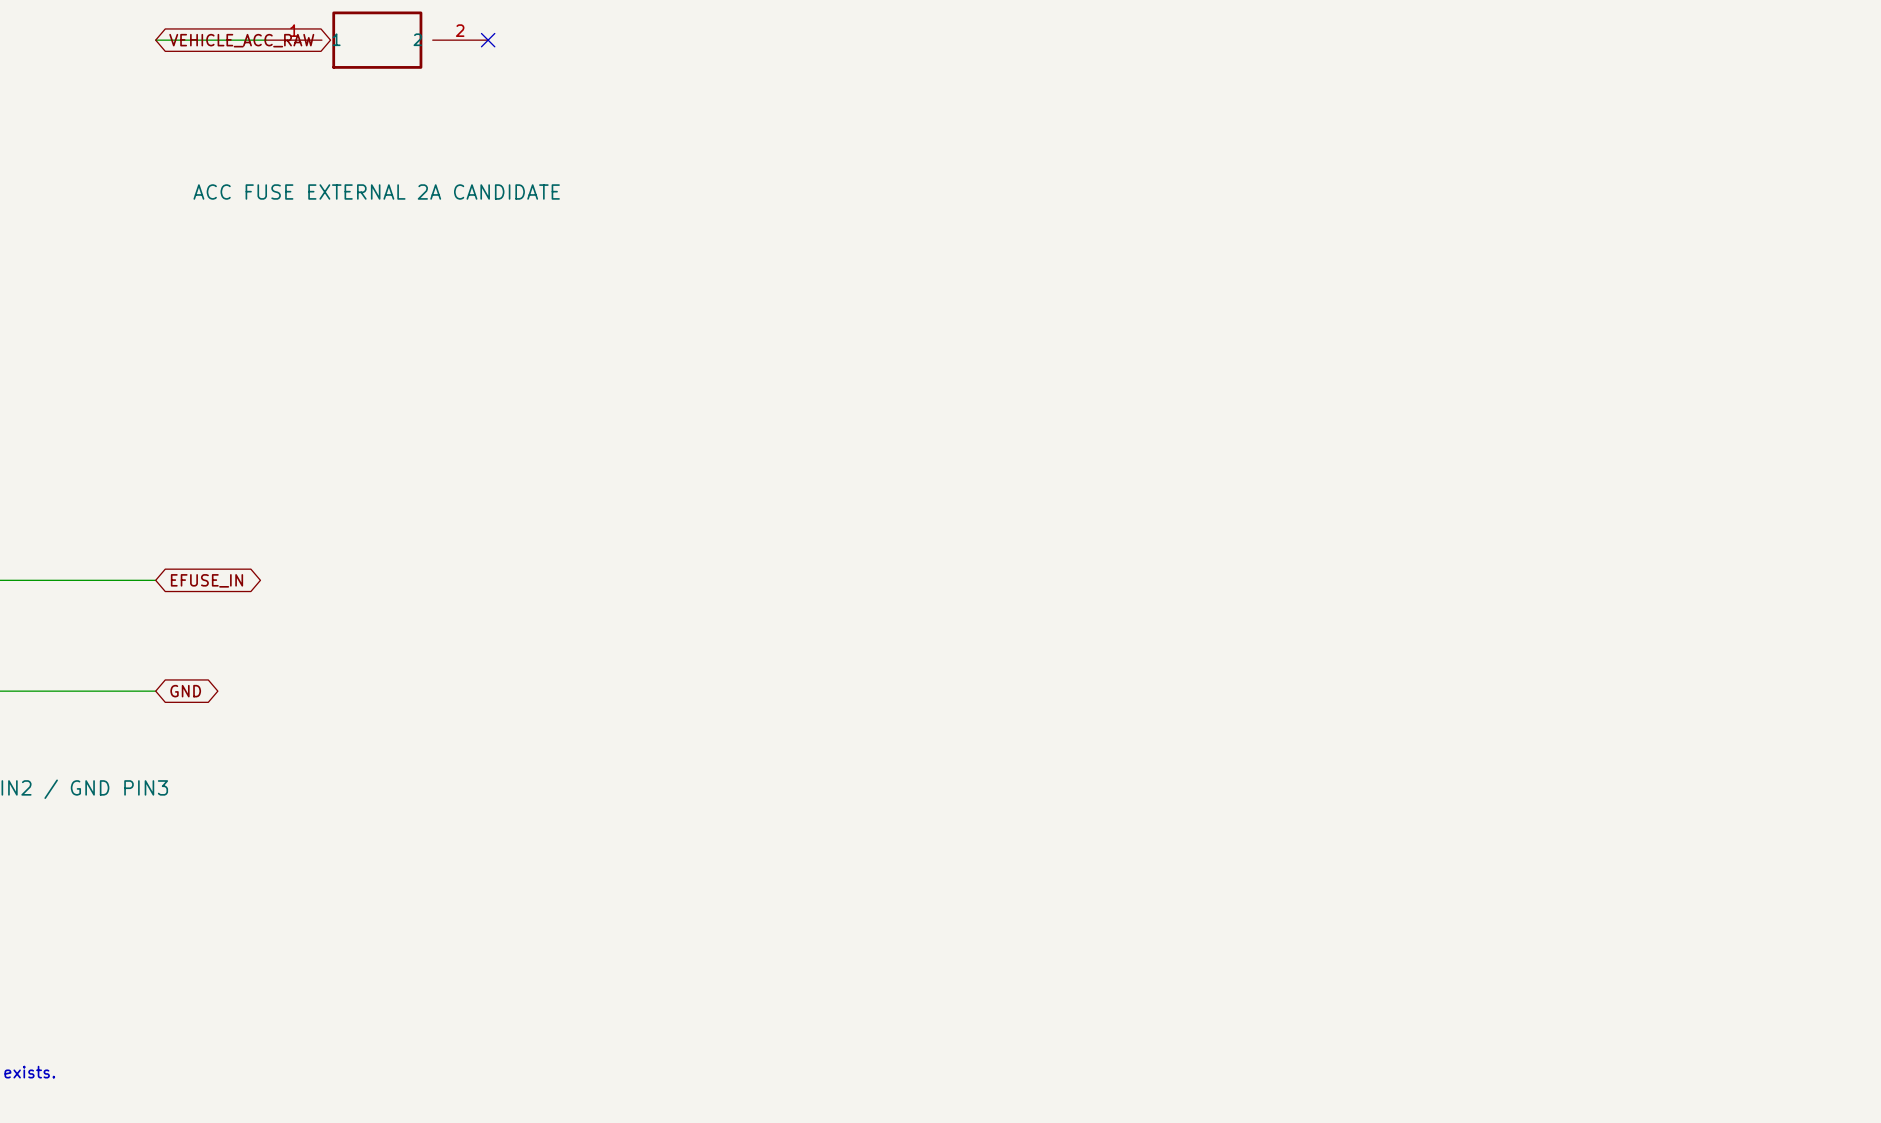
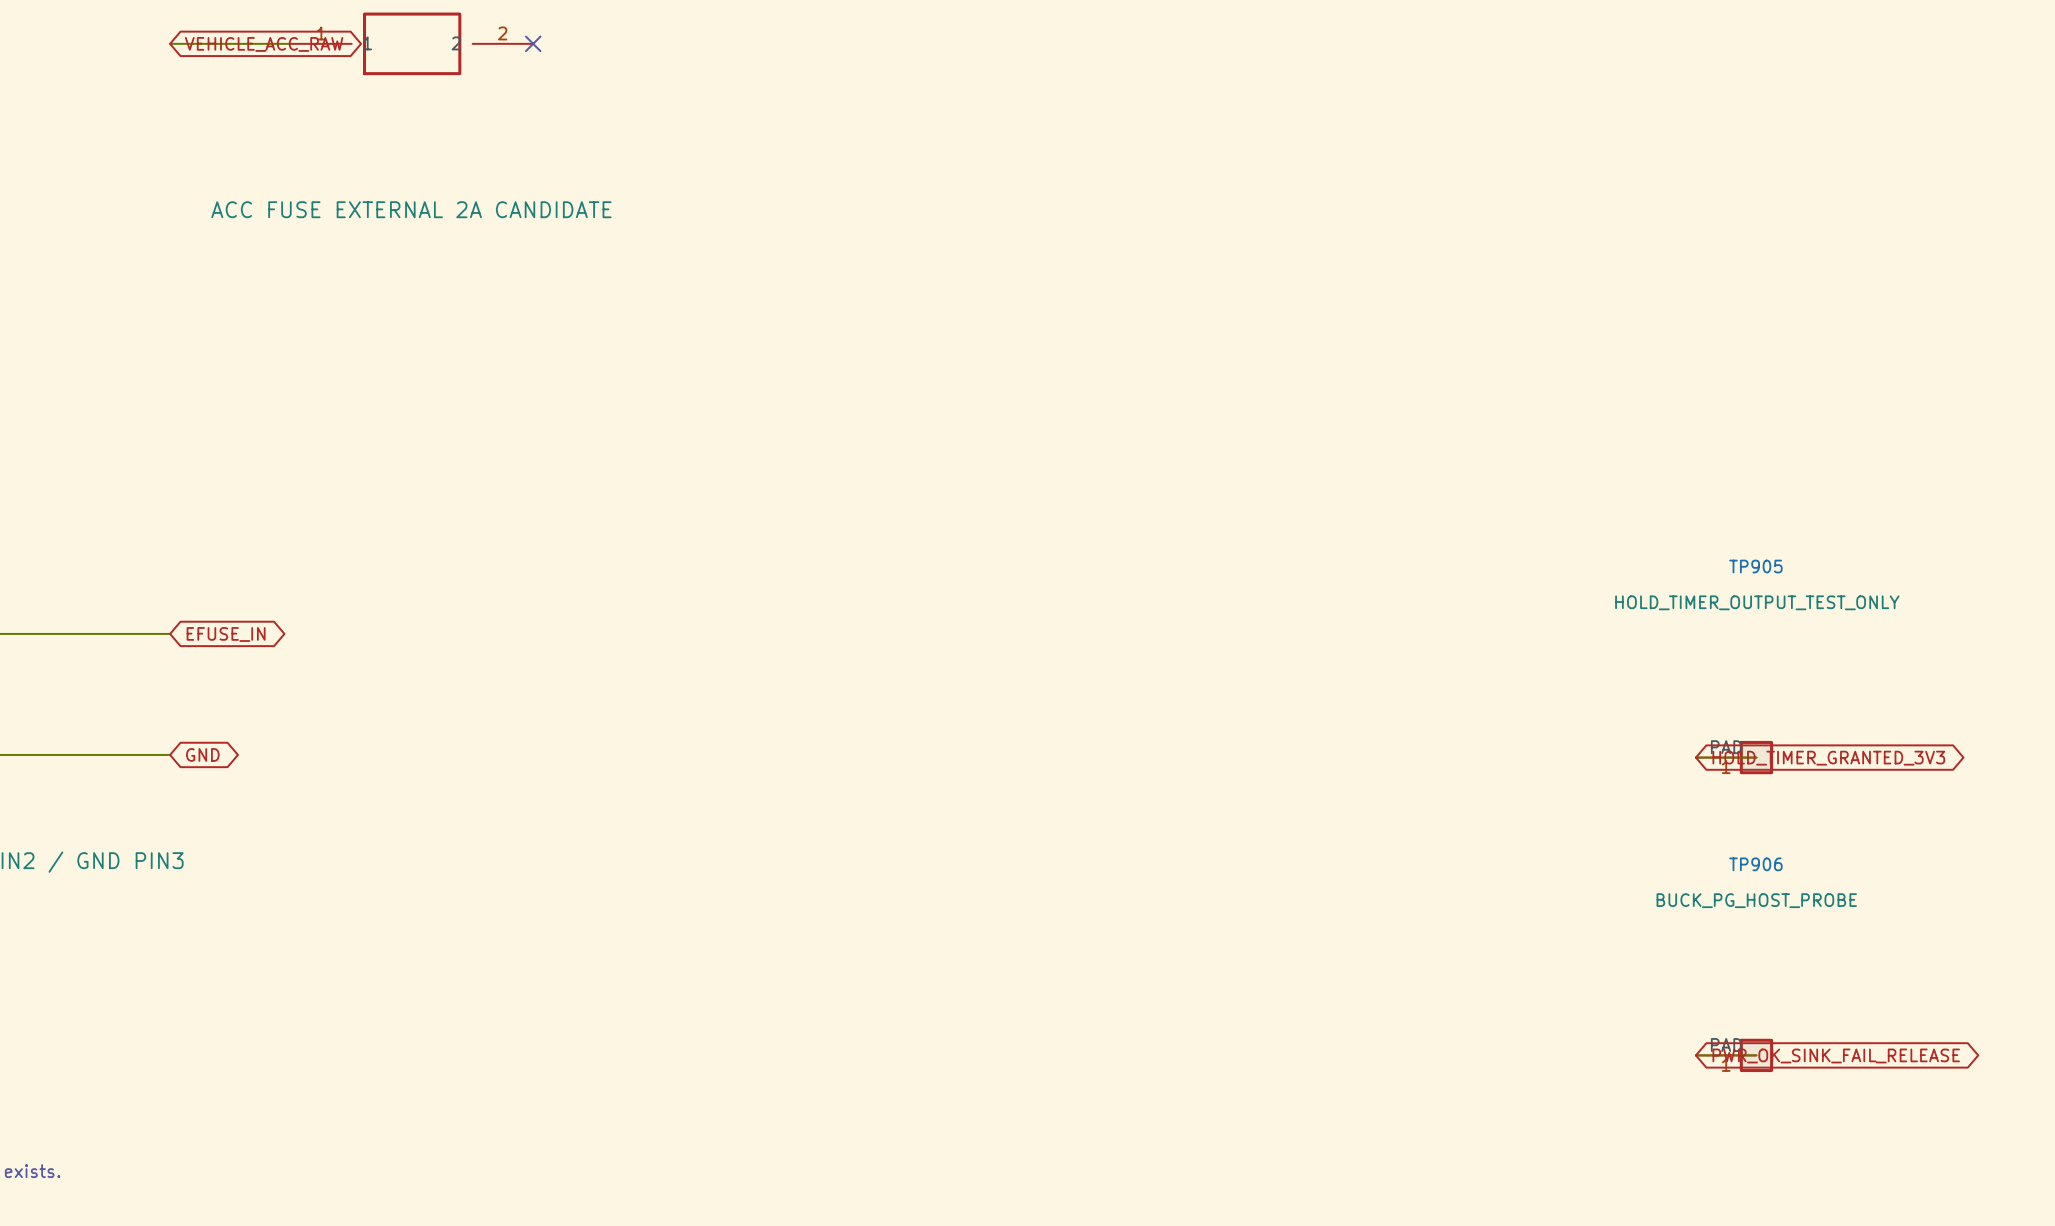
wire: none -> (1695, 757) (1756, 757)
TP905: none -> HOLD_TIMER_OUTPUT_TEST_ONLY (1734, 757)
global label: none -> HOLD_TIMER_GRANTED_3V3 (1828, 758)
wire: none -> (1695, 1055) (1756, 1055)
TP906: none -> BUCK_PG_HOST_PROBE (1734, 1055)
global label: none -> PWR_OK_SINK_FAIL_RELEASE (1836, 1055)

